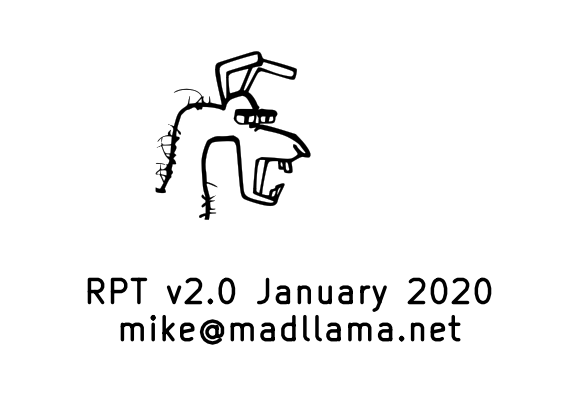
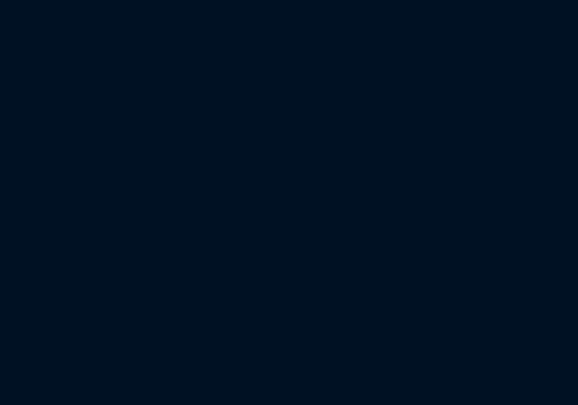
drawing: [155, 51, 311, 220] -> none
text: RPT v2.0 January 2020 (289, 294) -> none
text: mike@madllama.net (290, 329) -> none

